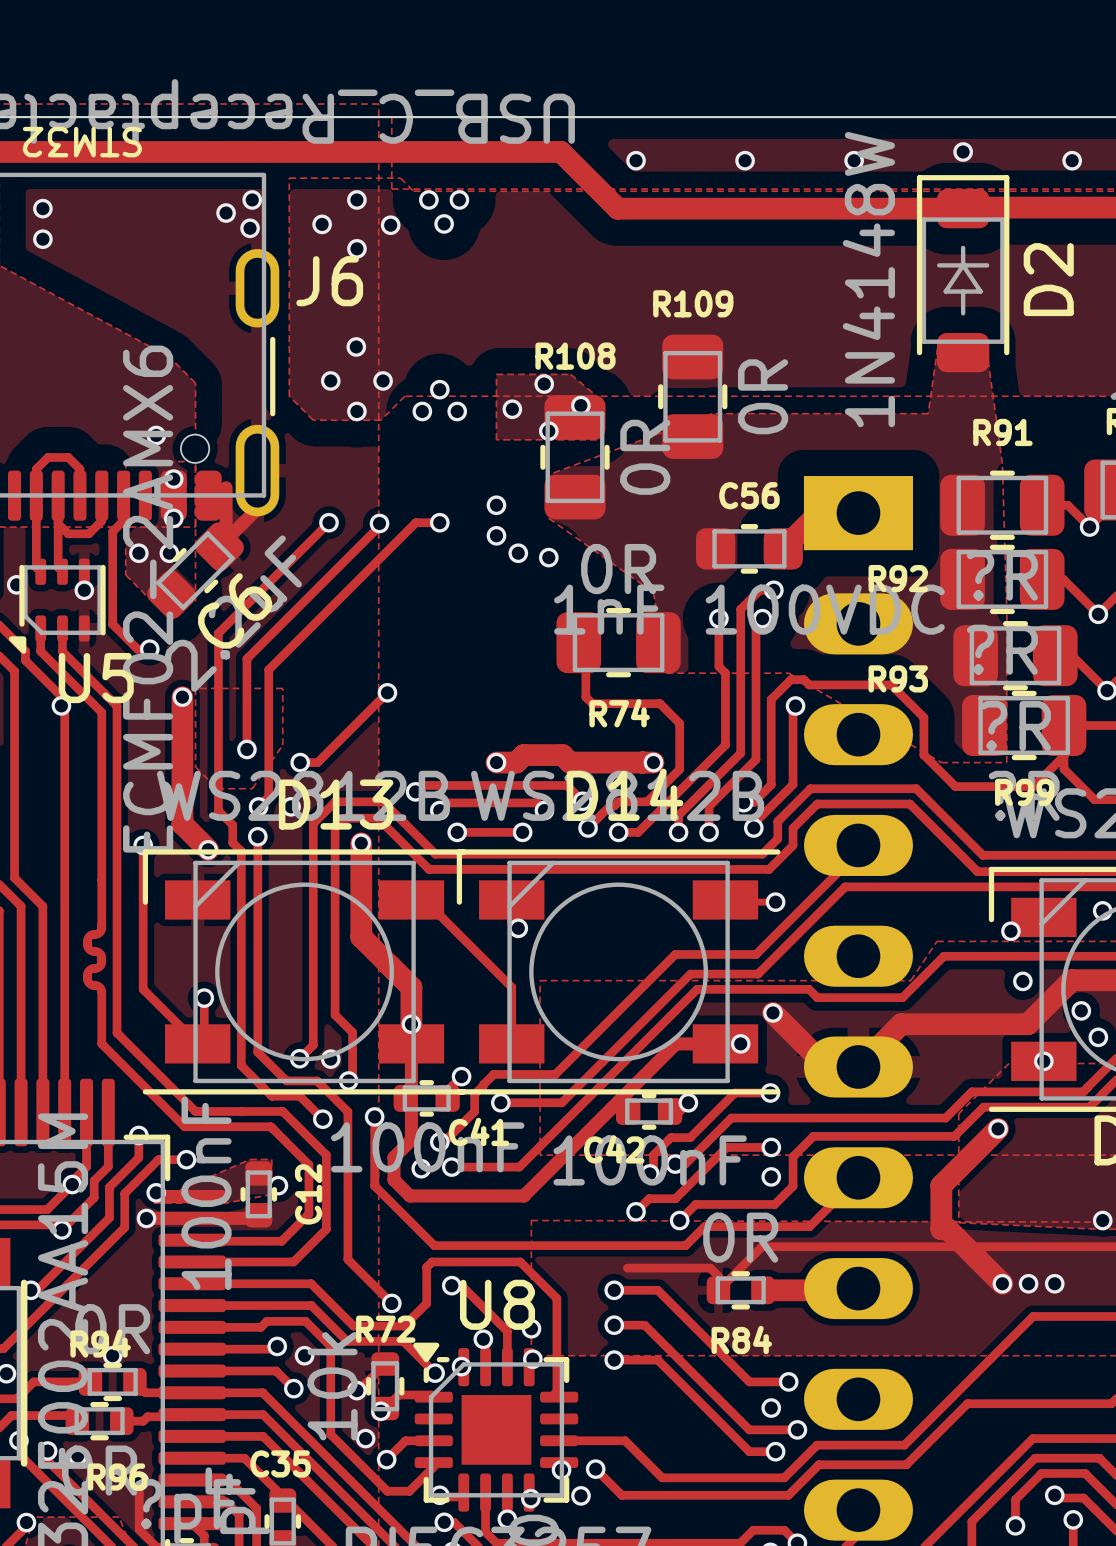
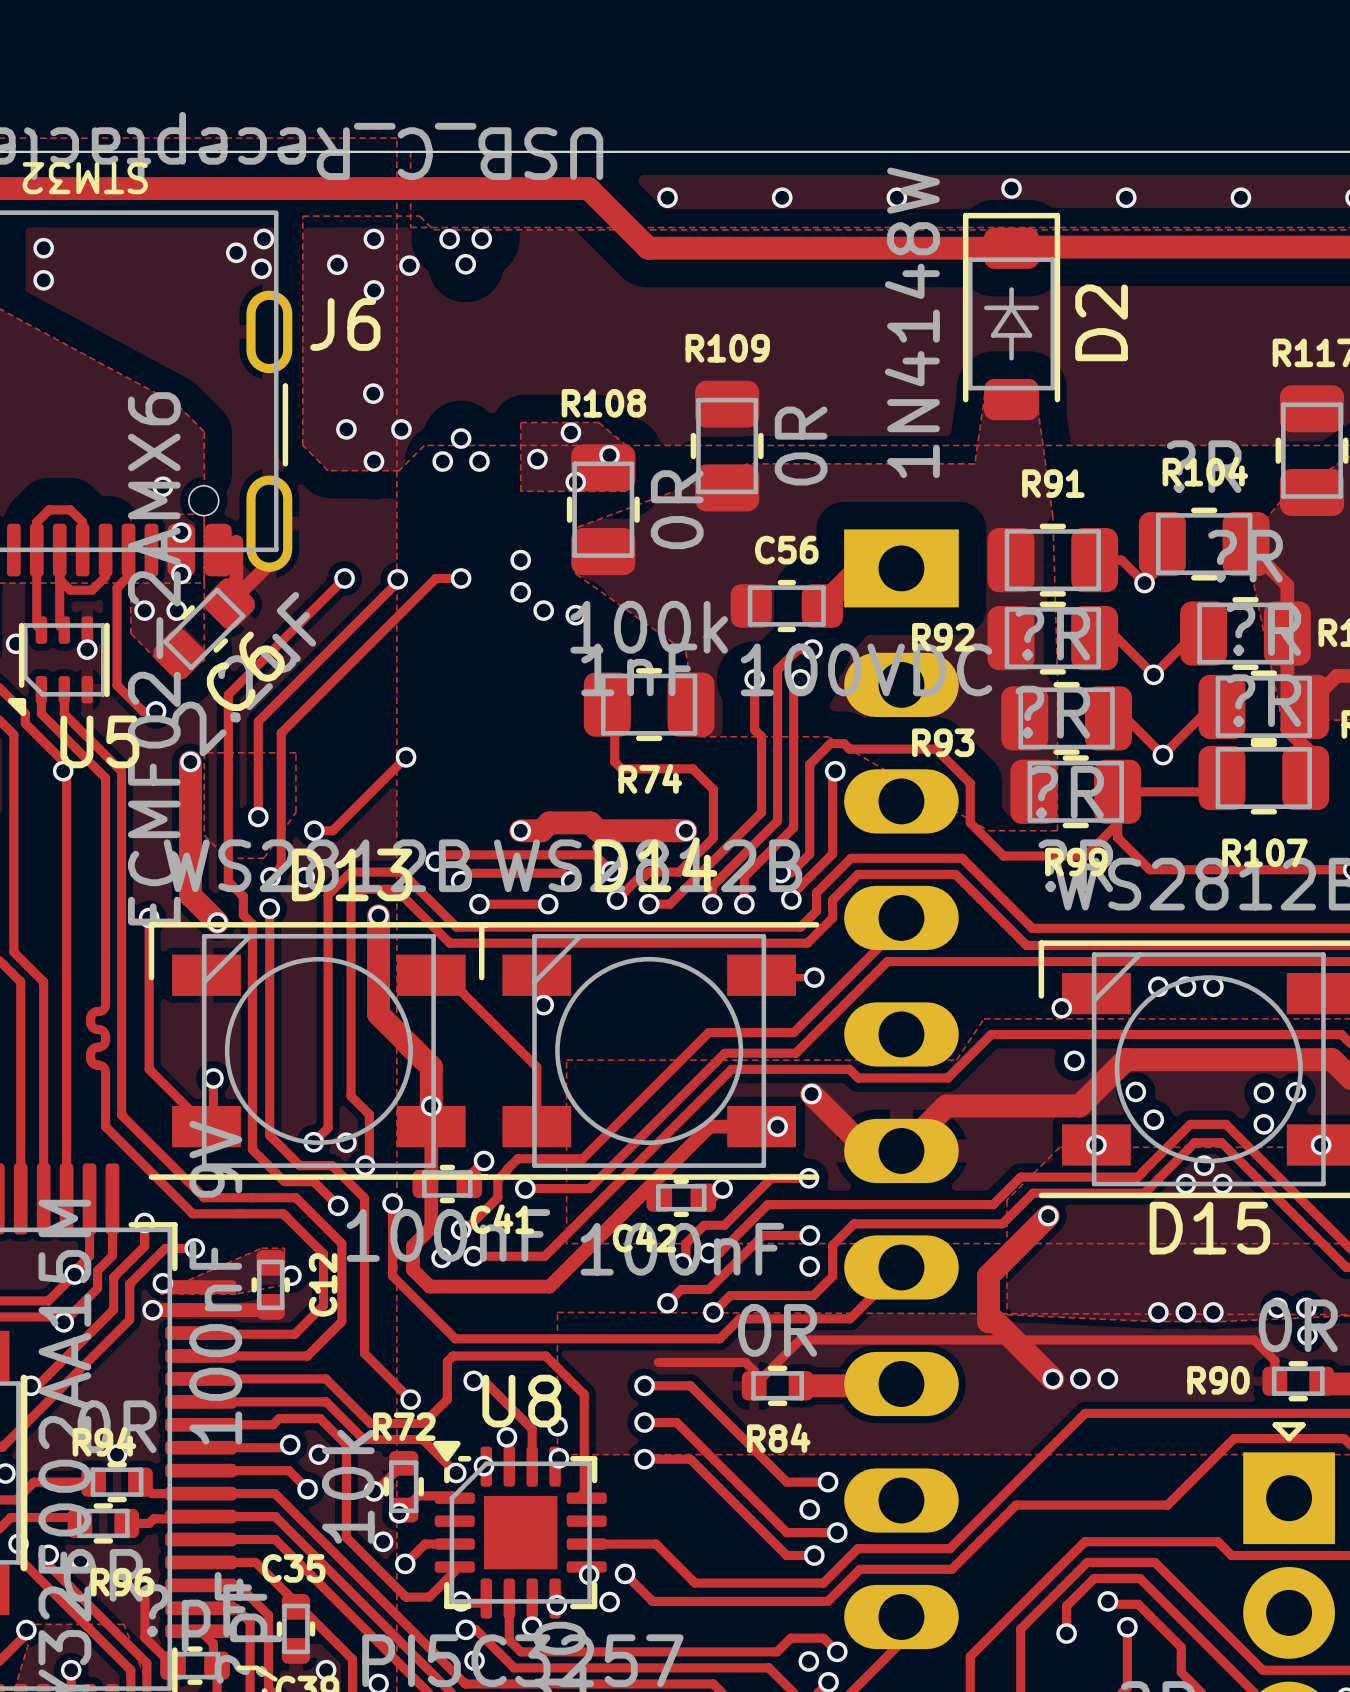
R74 value: 0R (618, 569) -> 100k (649, 627)
C12 value: 100nF (206, 1193) -> 100nF 9V (215, 1282)

